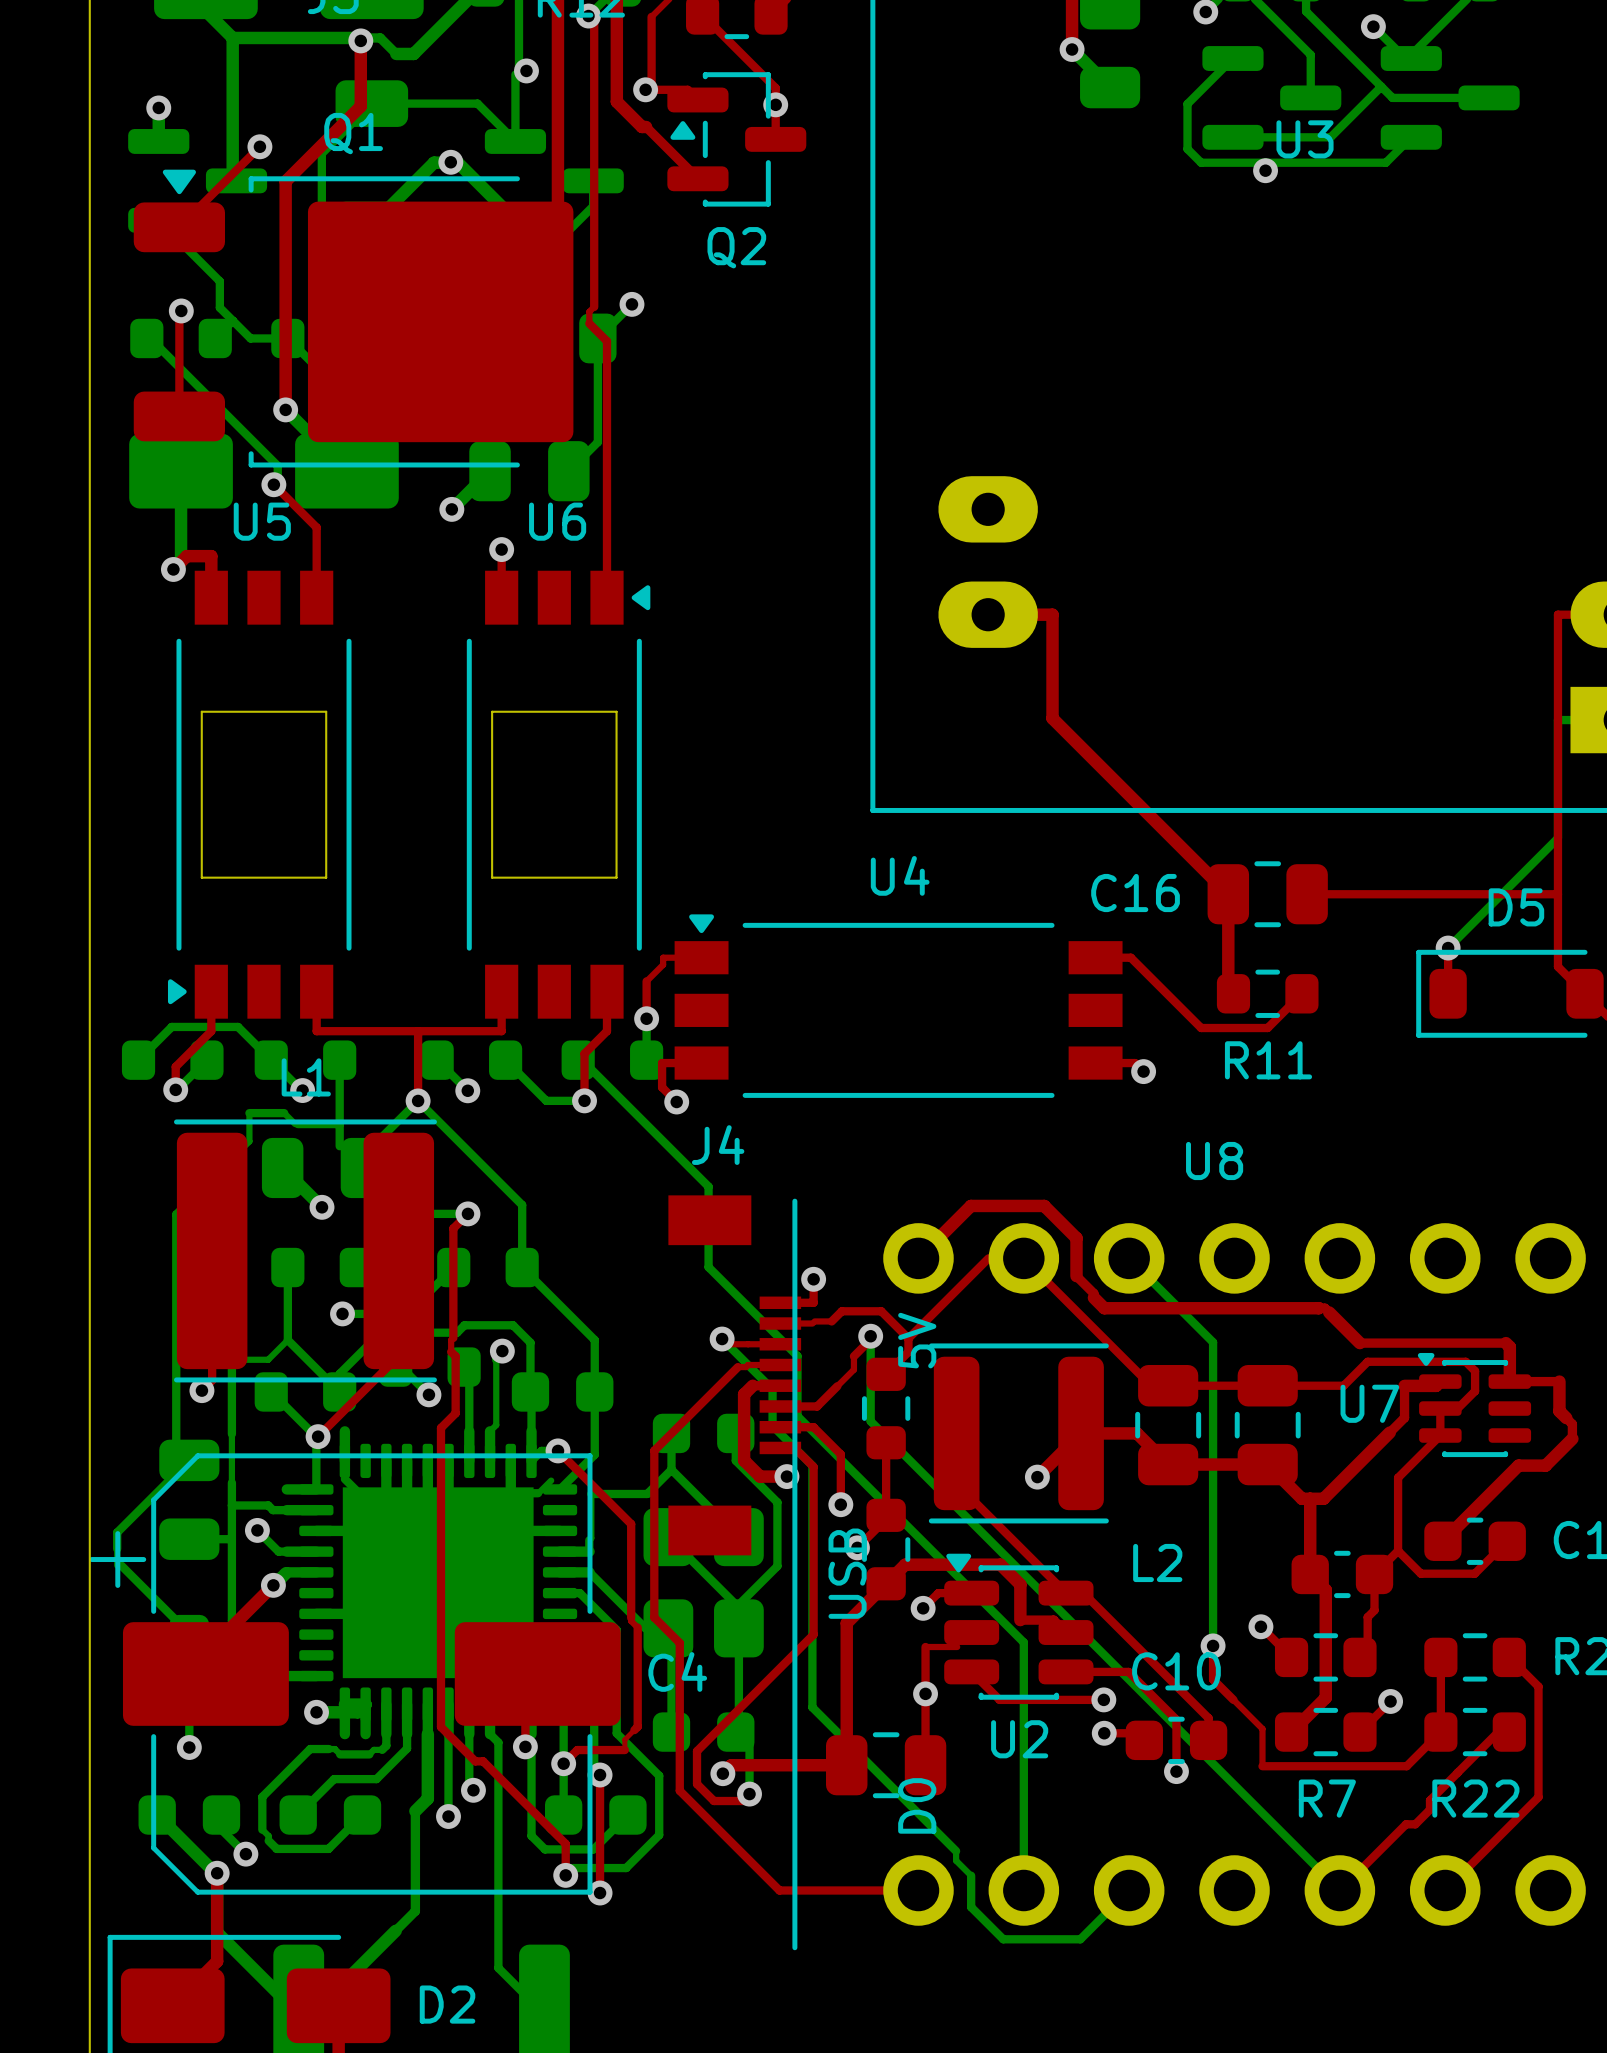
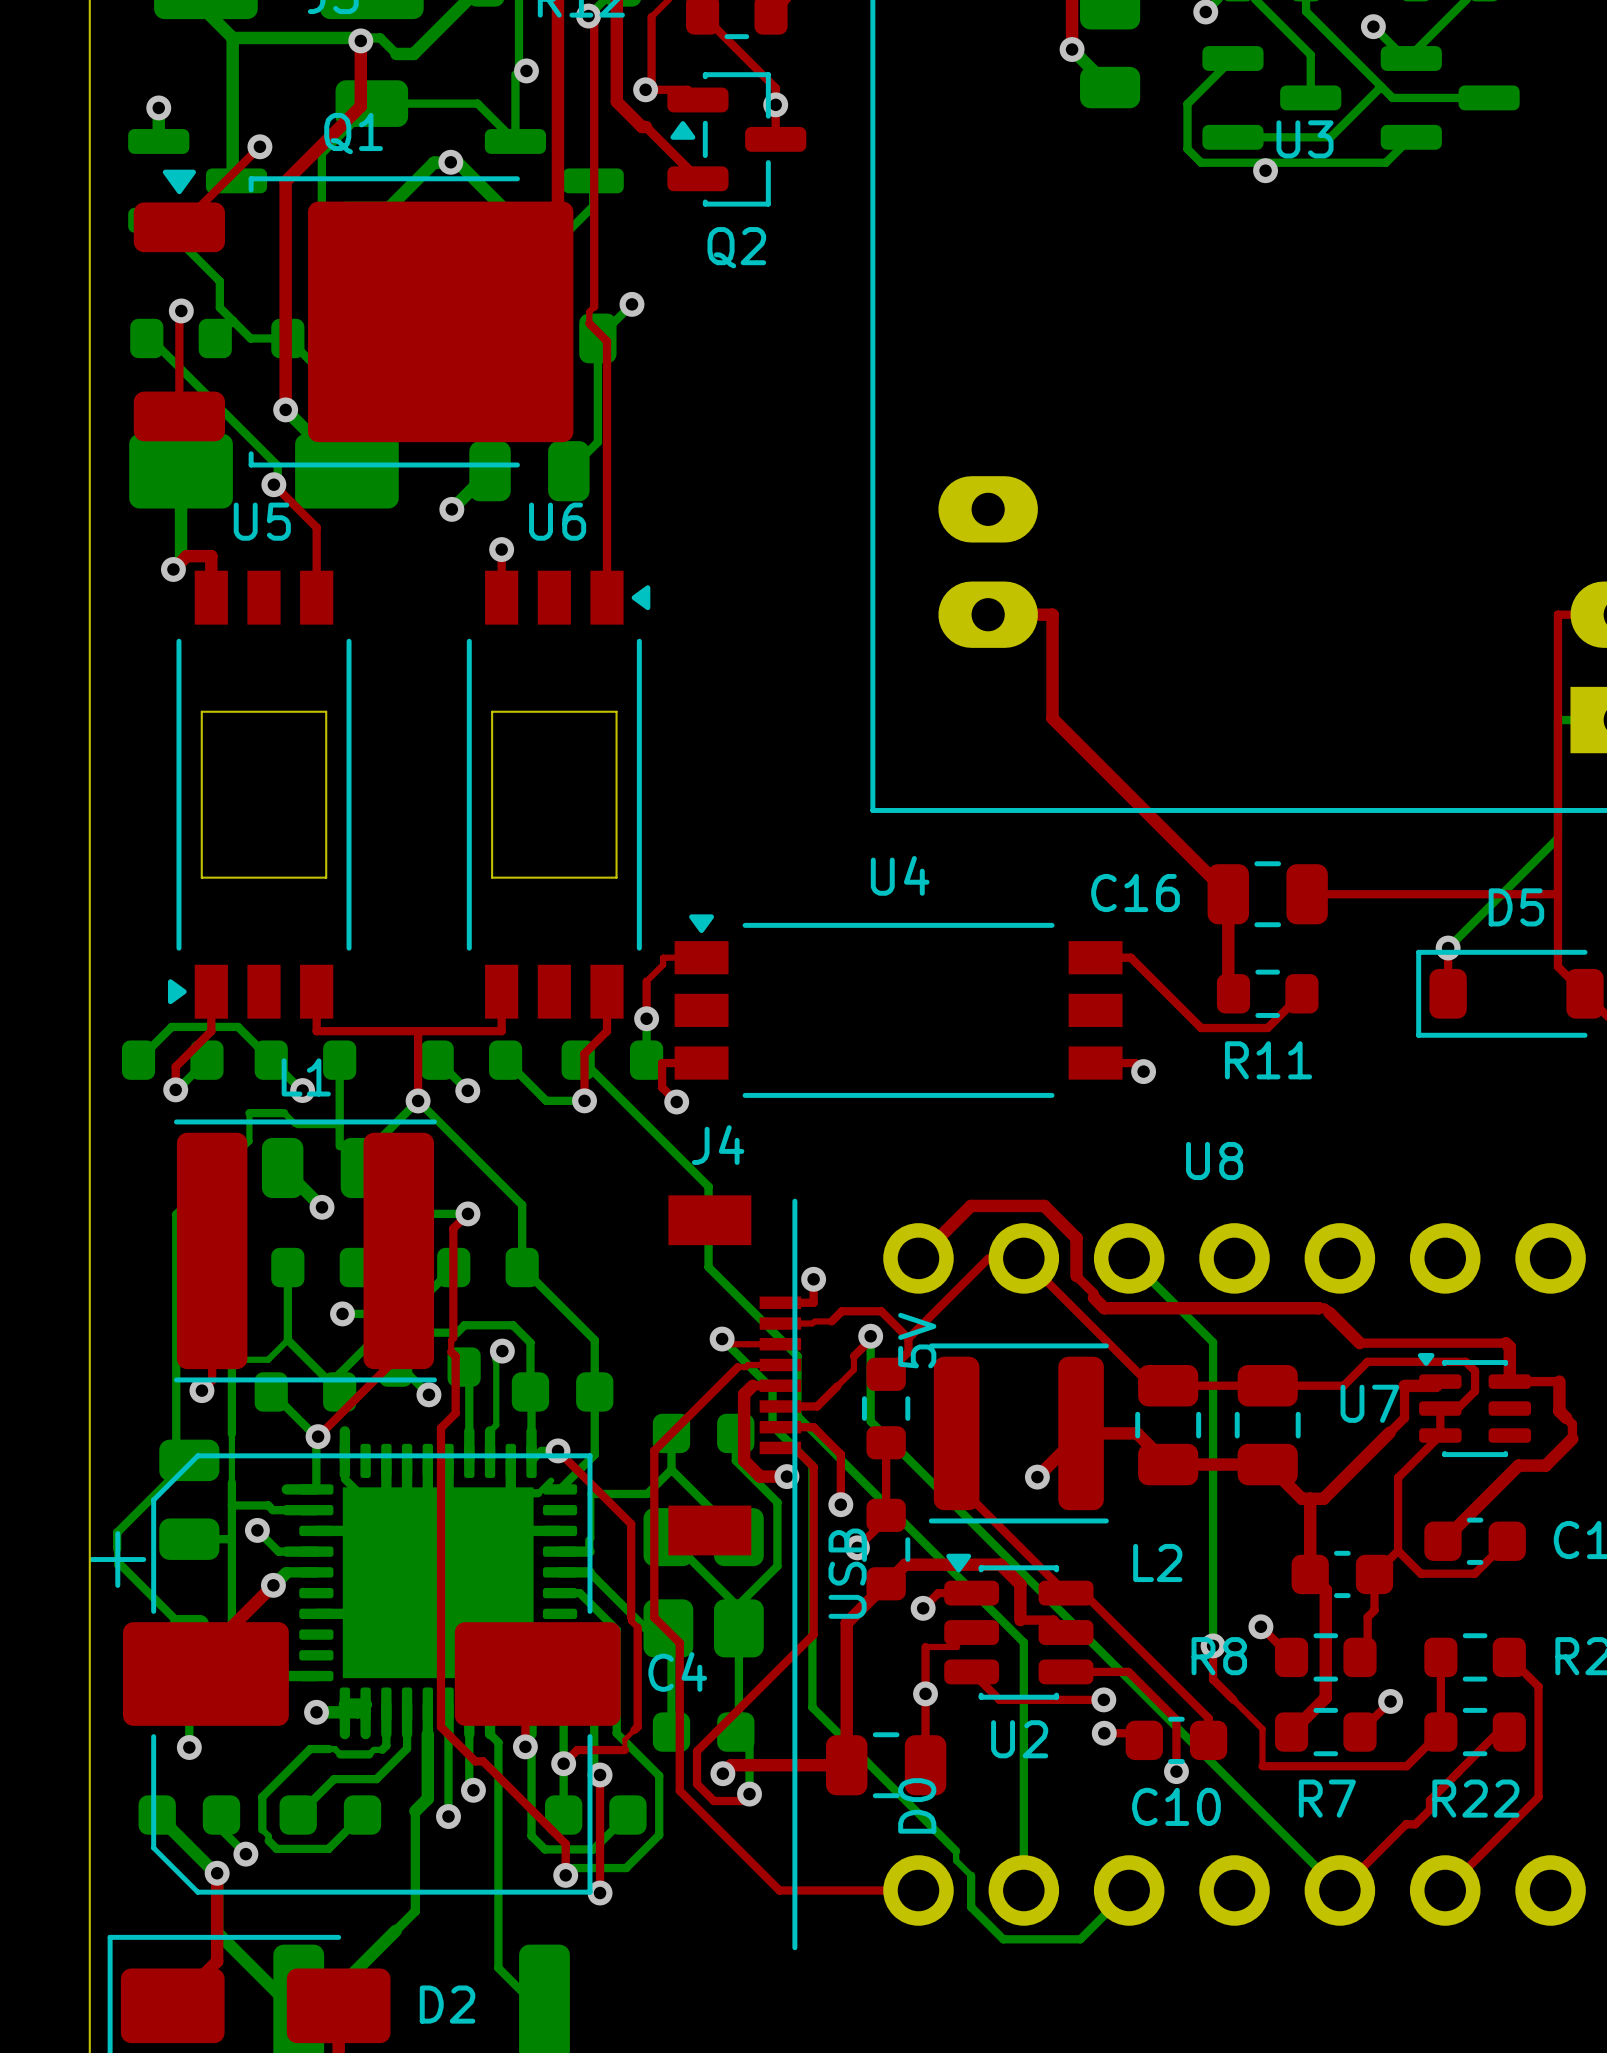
R8 name: none -> R8 (1219, 1656)
C10 name position: C10 (1176, 1671) -> C10 (1176, 1806)

